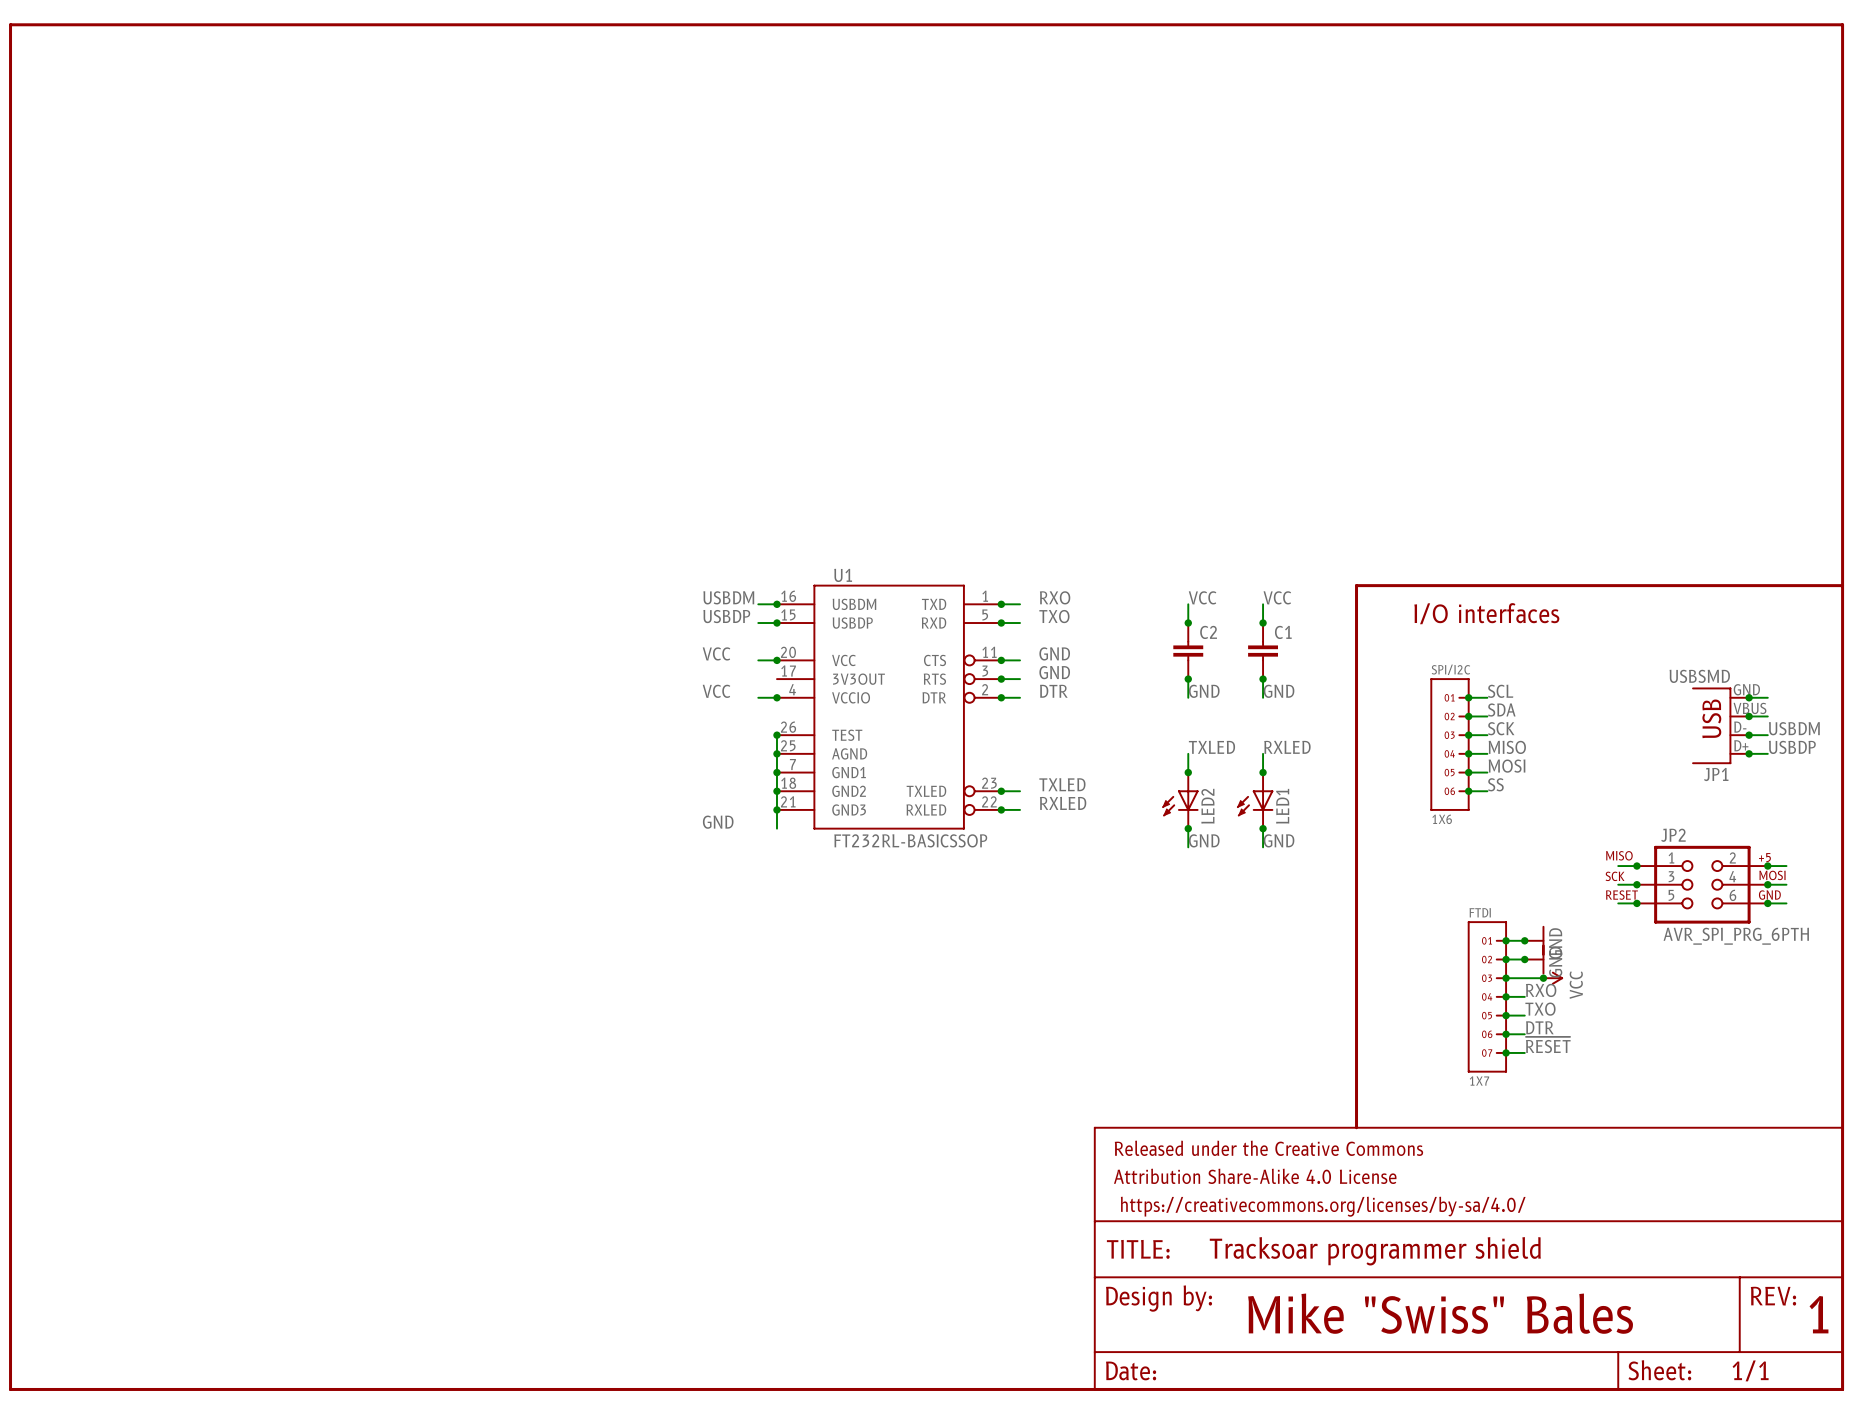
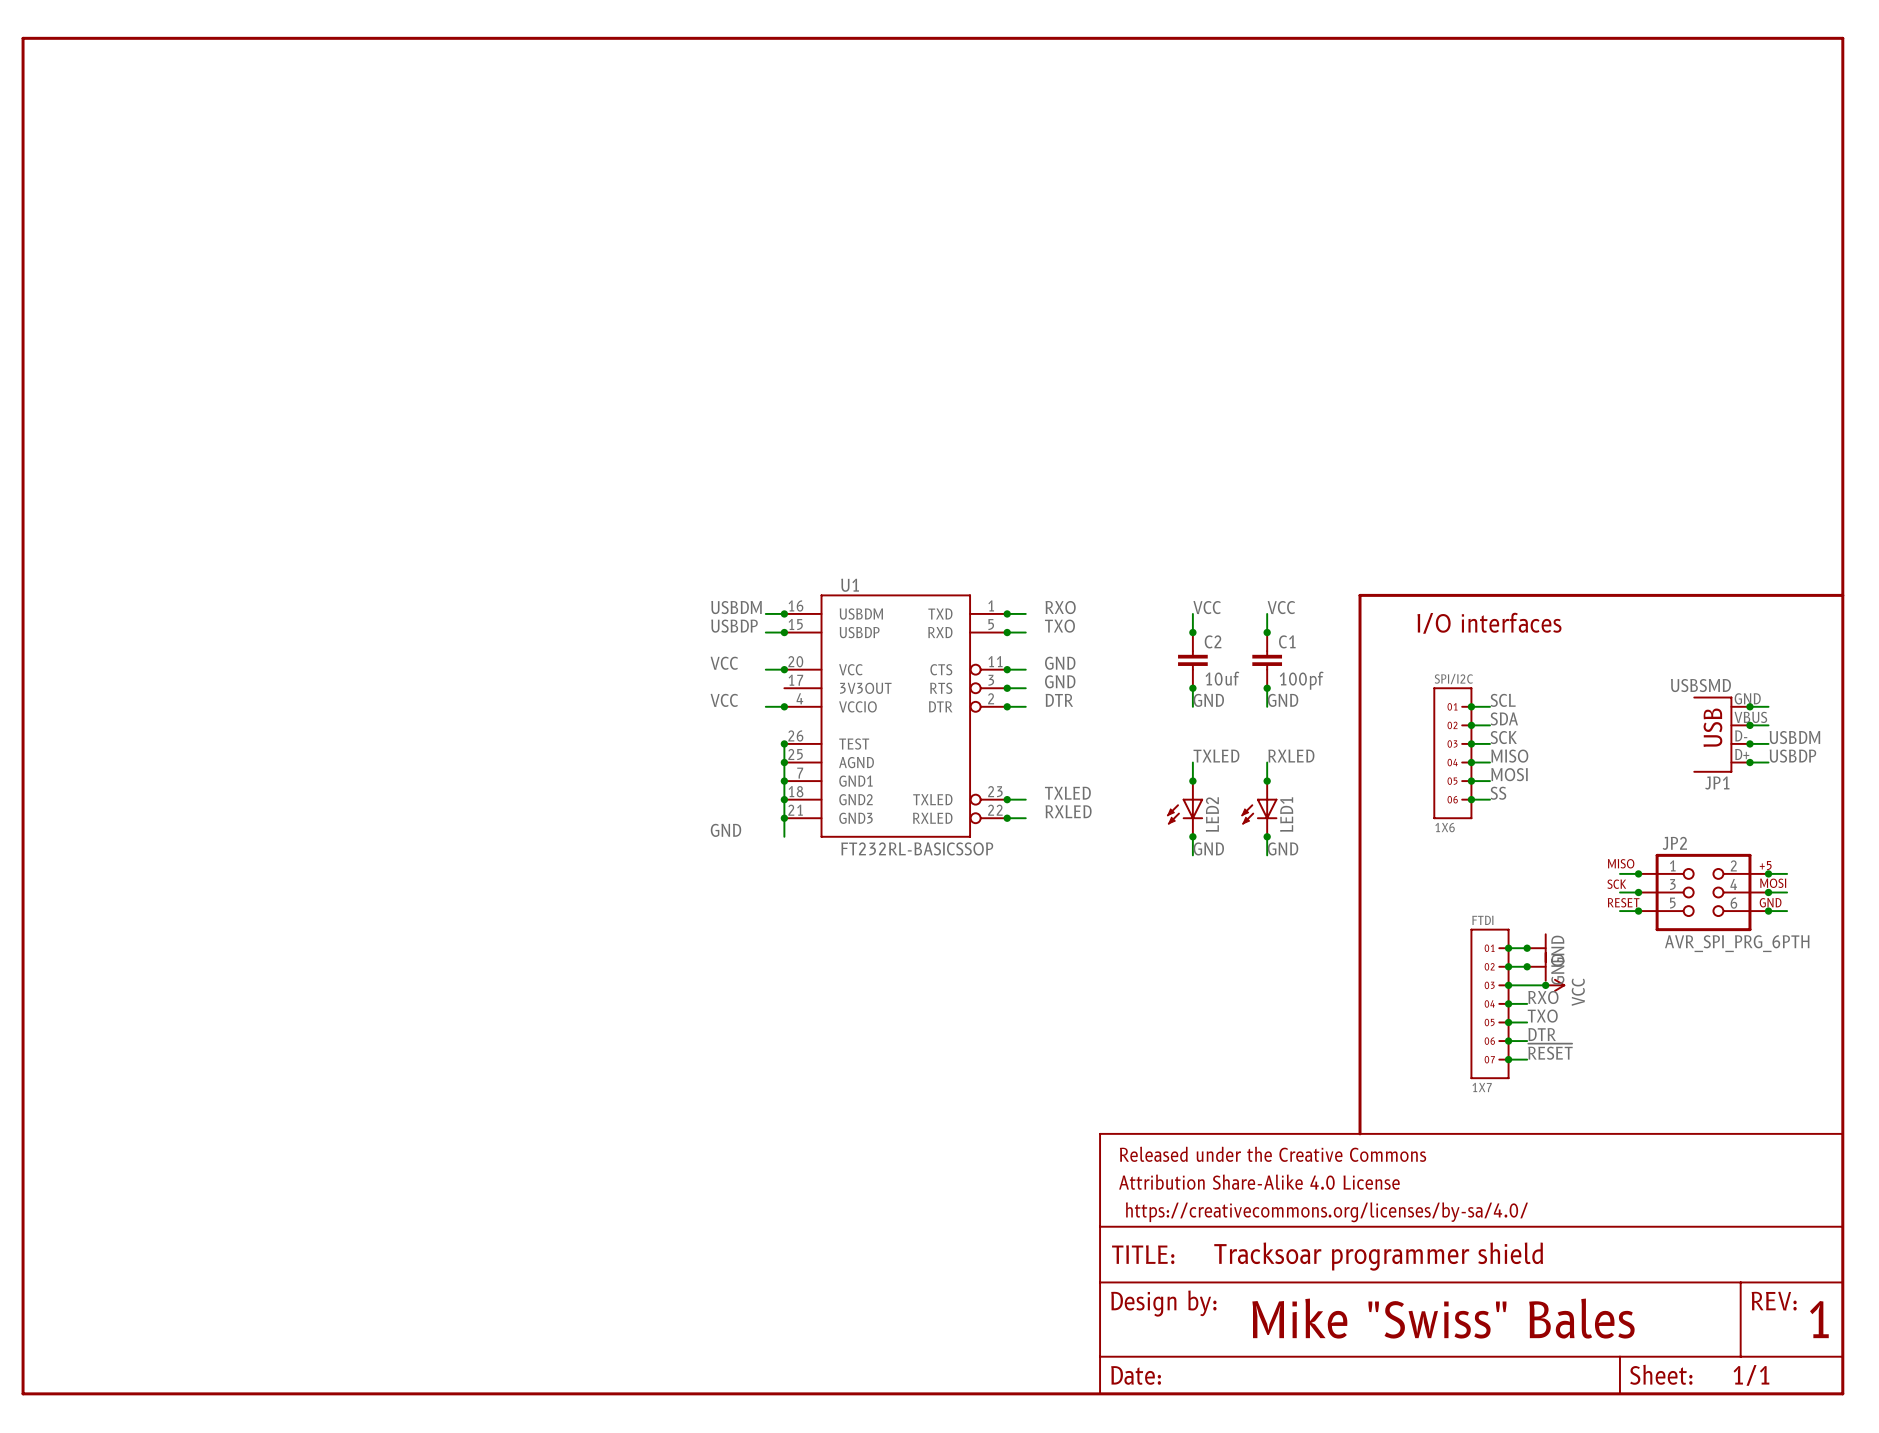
C2 value: none -> 10uf (1222, 678)
C1 value: none -> 100pf (1301, 680)

